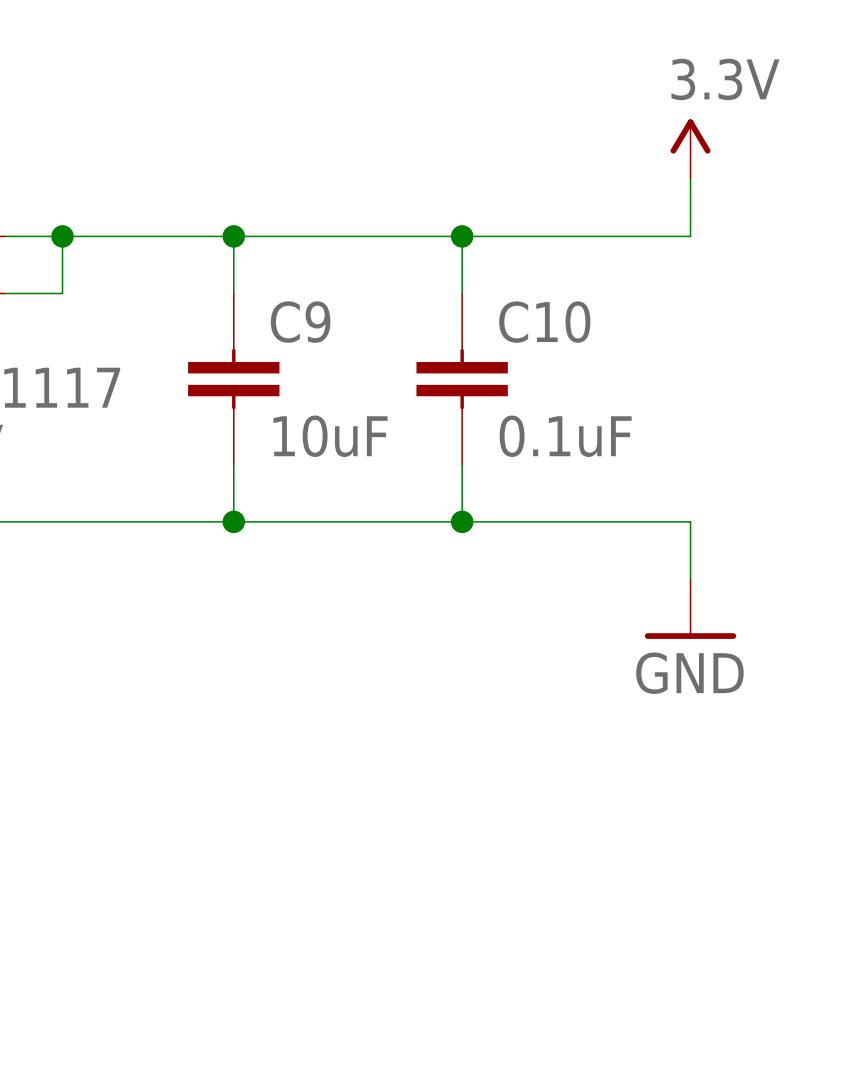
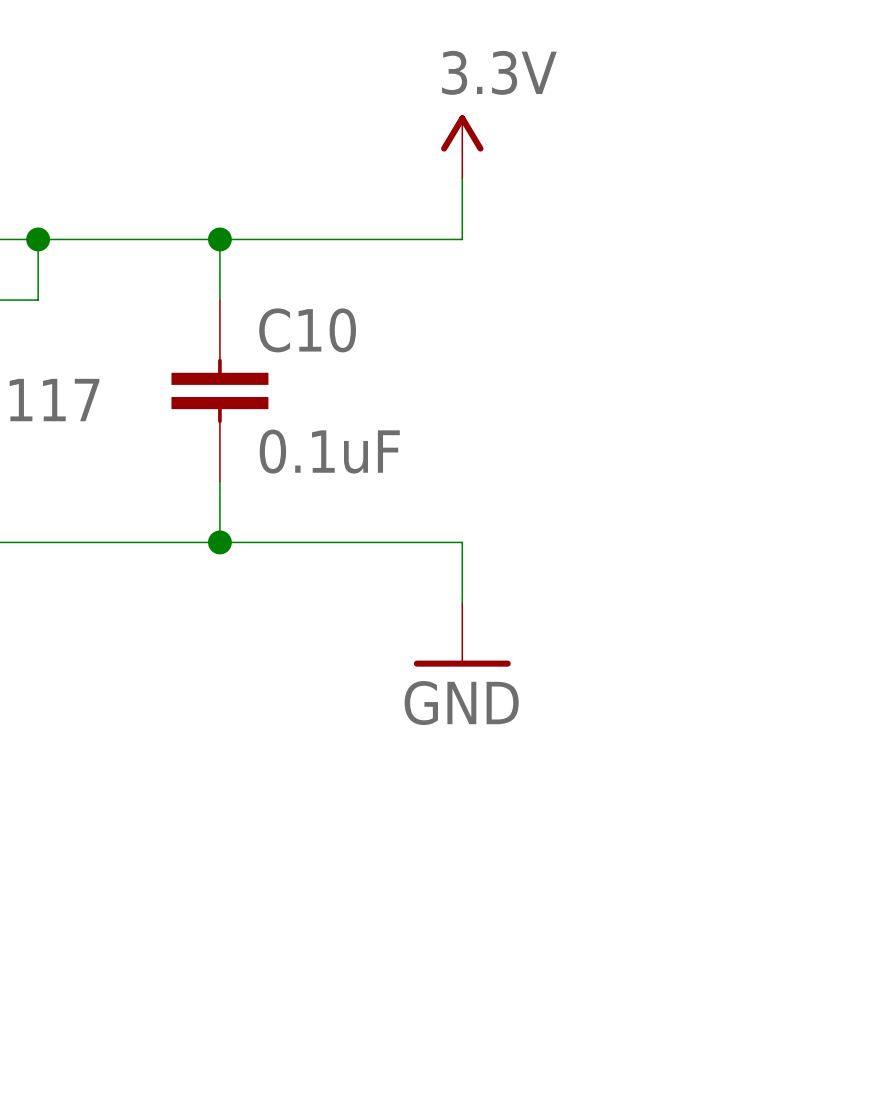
power symbol position: 3.3V (690, 149) -> 3.3V (462, 147)
wire: none -> (462, 178) (462, 239)
wire: (690, 179) (690, 236) (462, 236) (462, 293) -> none
junction: (462, 236) -> none
C9 name: C9 (300, 322) -> C10 (307, 330)
C10: 0.1uF (462, 379) -> none
C9 value: 10uF (330, 436) -> 0.1uF (329, 451)
wire: (462, 464) (462, 521) (690, 521) (690, 578) -> none
wire: none -> (462, 542) (462, 603)
junction: (462, 521) -> none
power symbol position: GND (690, 608) -> GND (462, 634)

